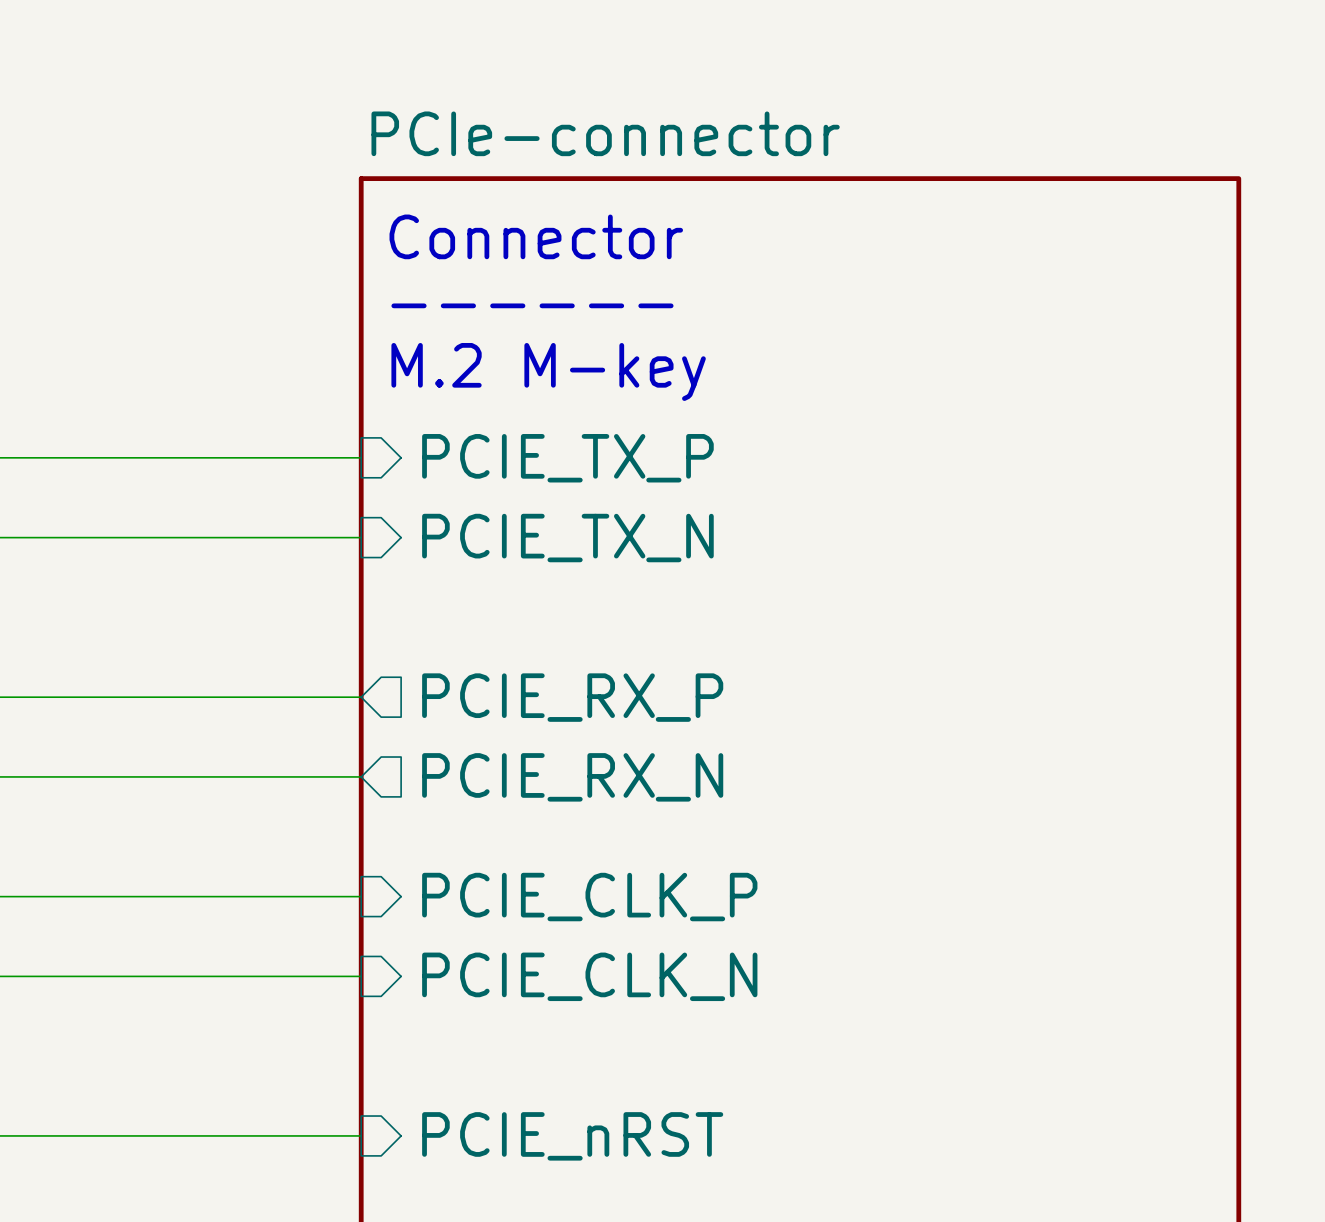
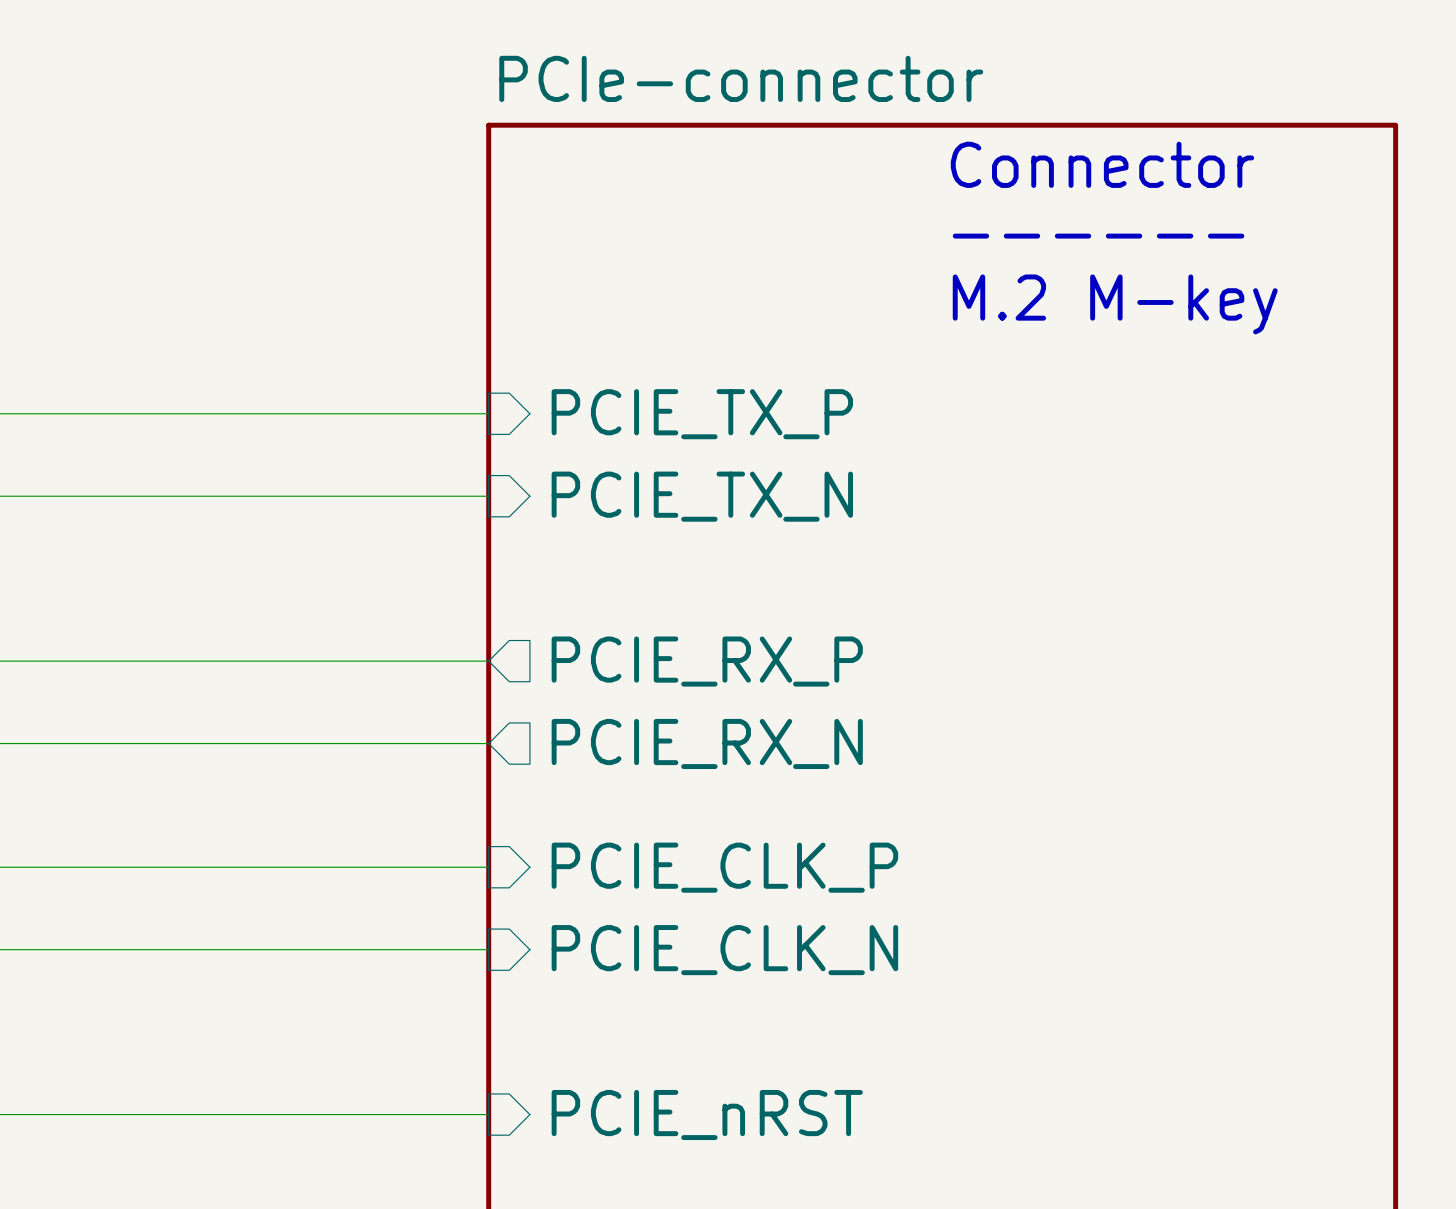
text position: Connector (536, 236) -> Connector (1102, 164)
text position: ------ (532, 305) -> ------ (1098, 236)
text position: M.2 M-key (548, 371) -> M.2 M-key (1115, 304)

